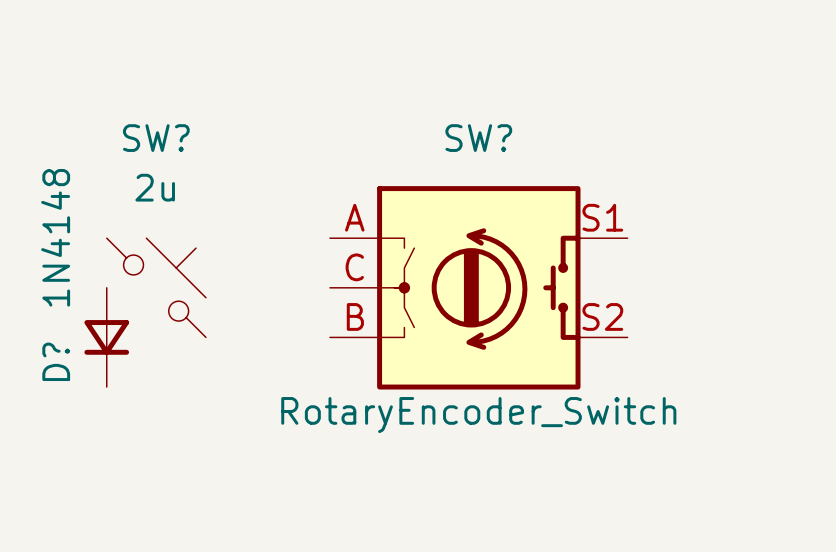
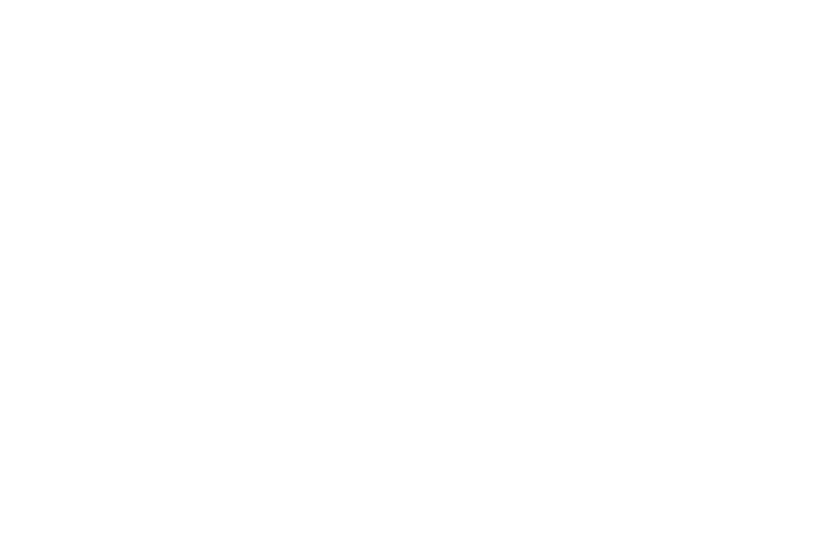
SW?: 2u (156, 287) -> none
SW?: RotaryEncoder_Switch (478, 287) -> none
D?: 1N4148 (106, 337) -> none

